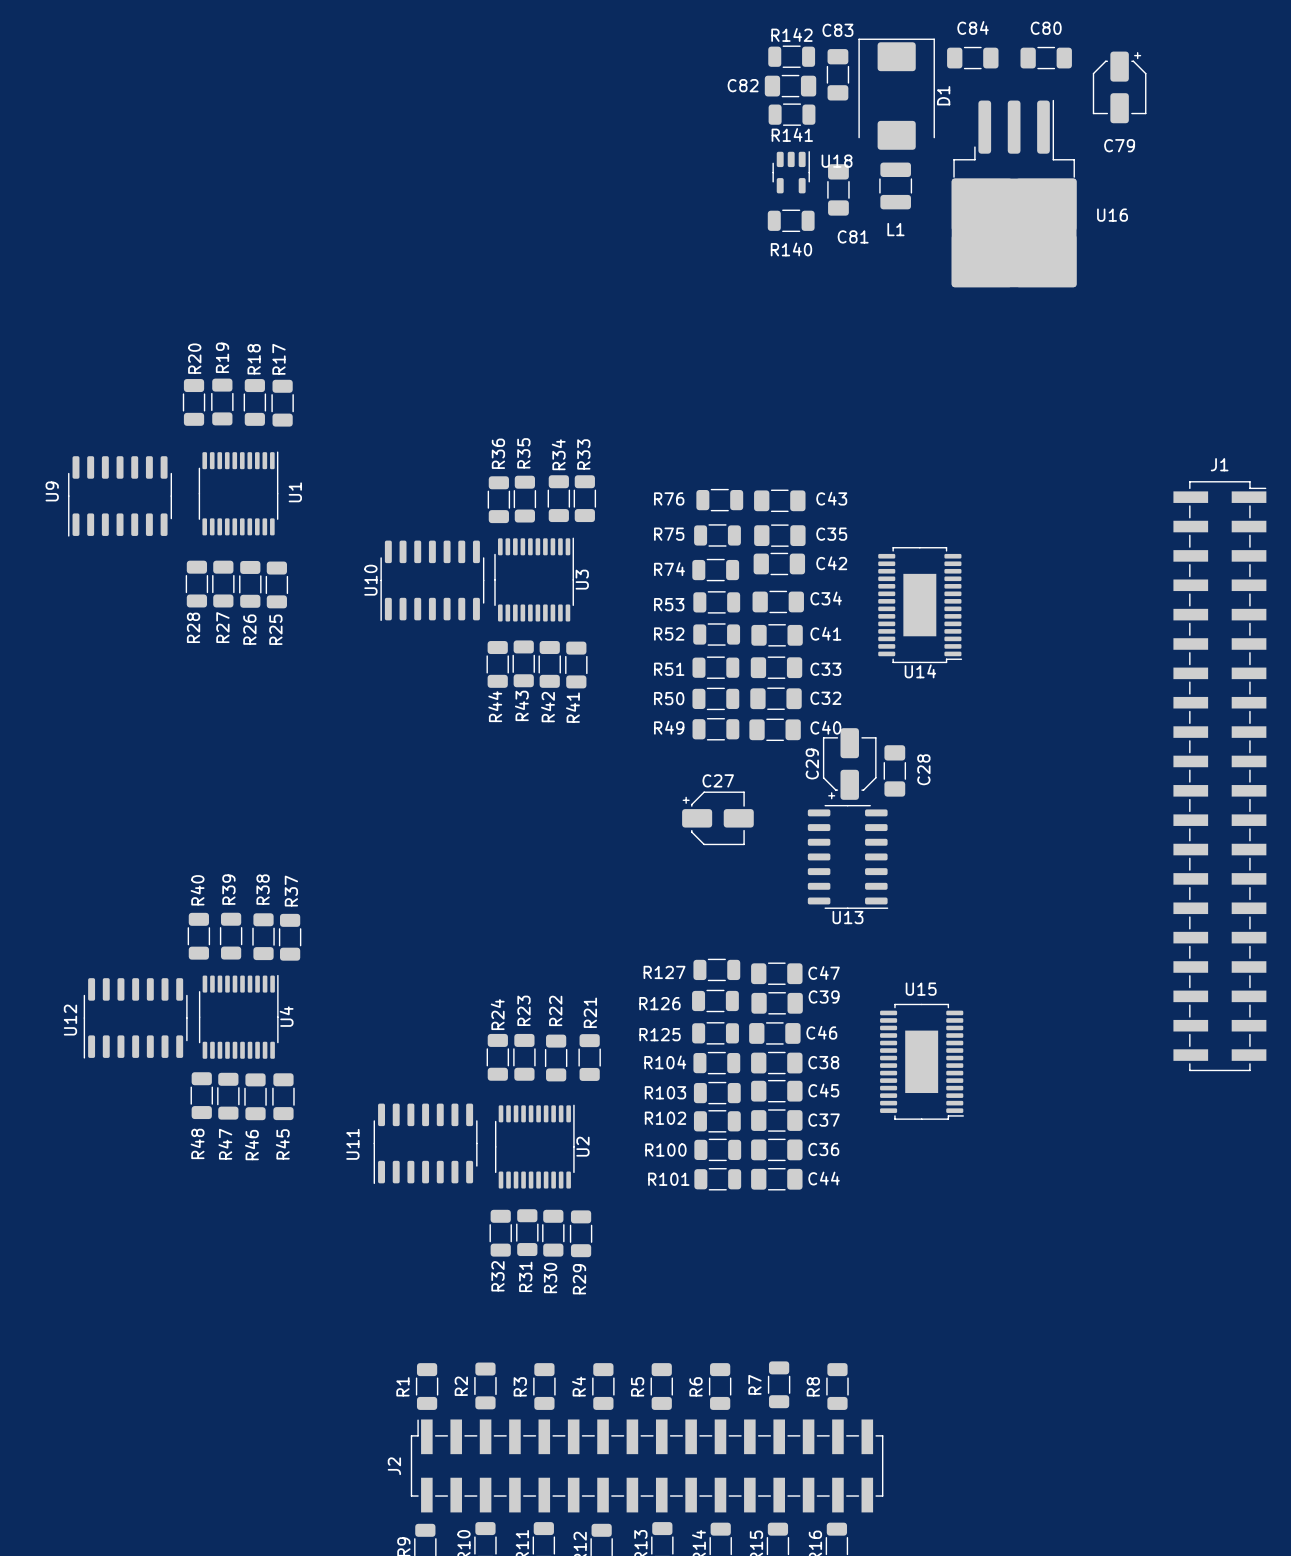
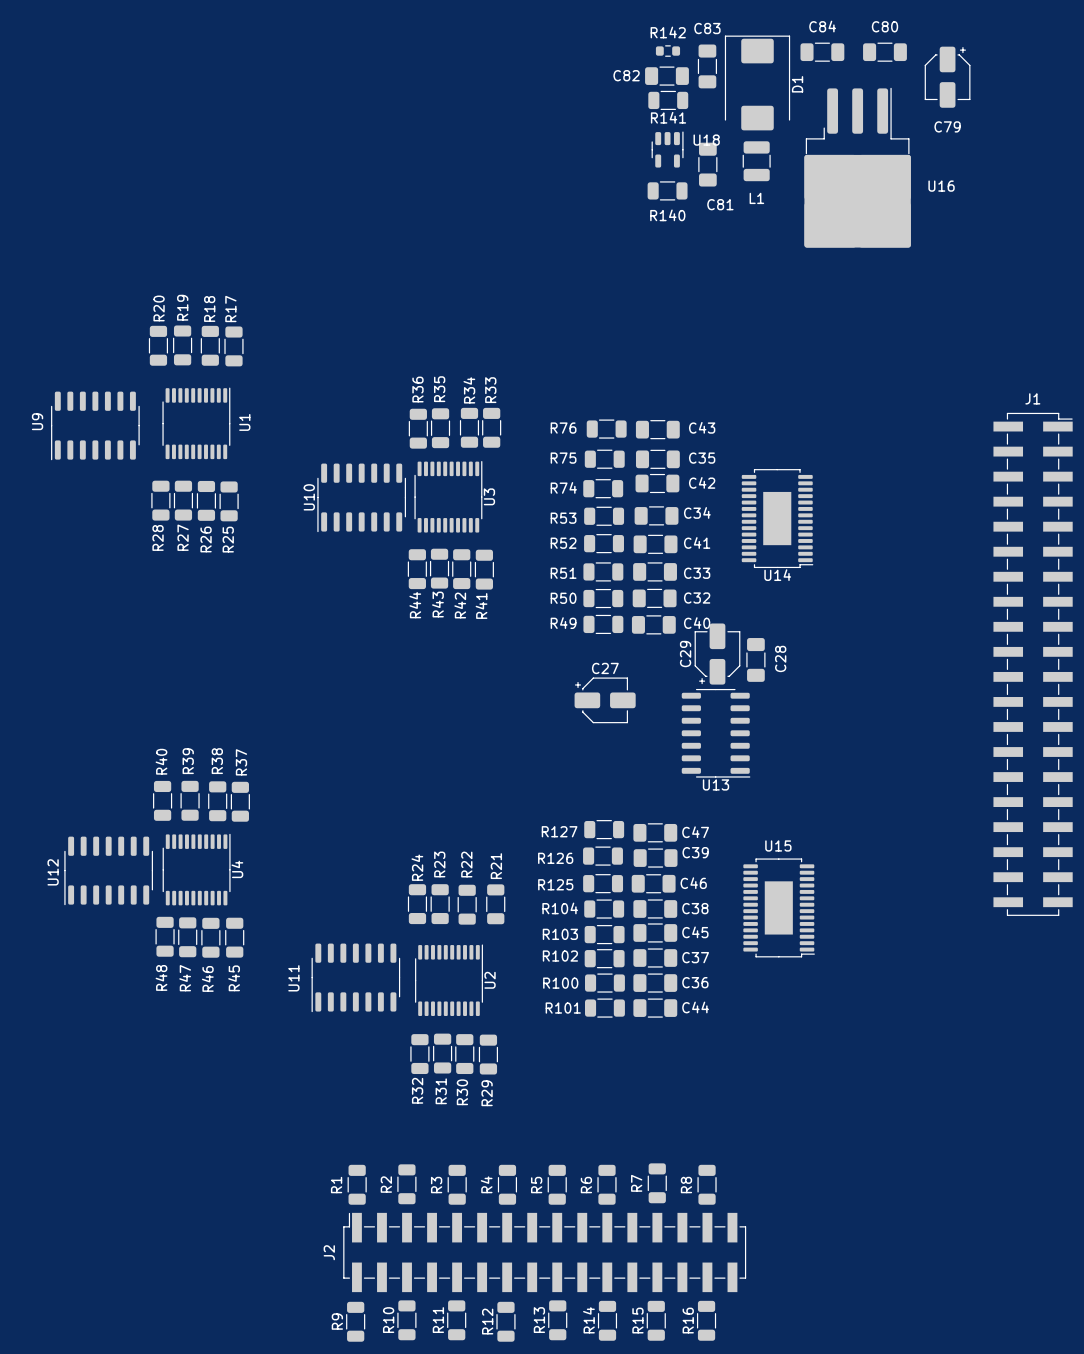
R142 footprint: [768, 45, 816, 68] -> [655, 45, 681, 57]

